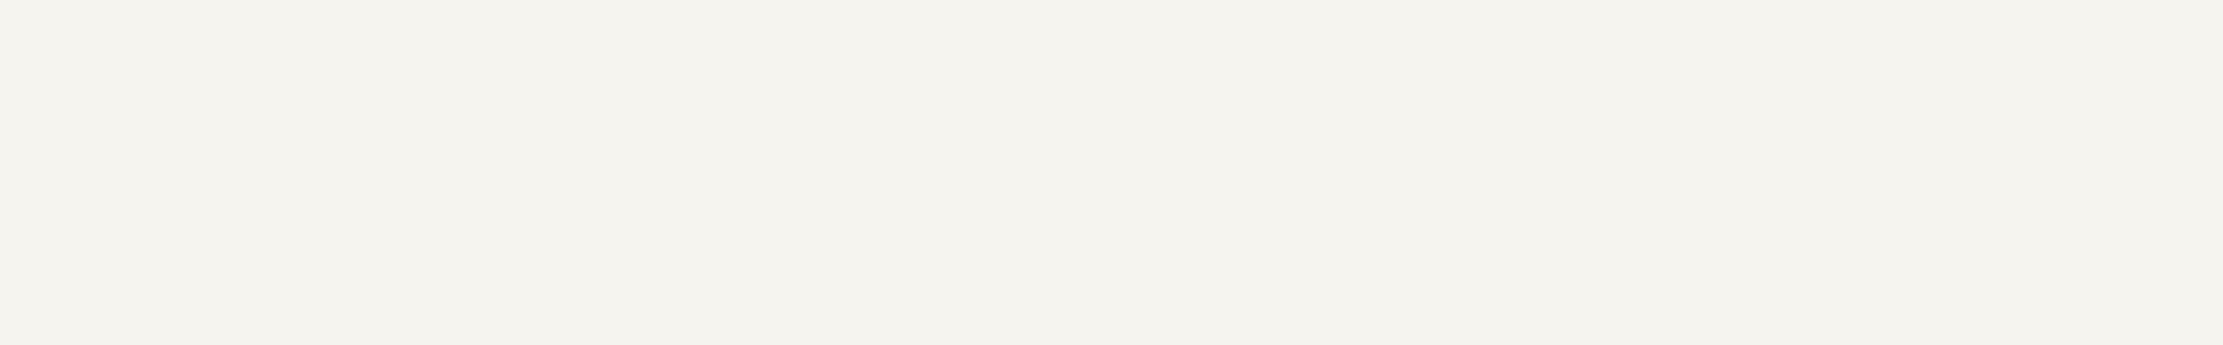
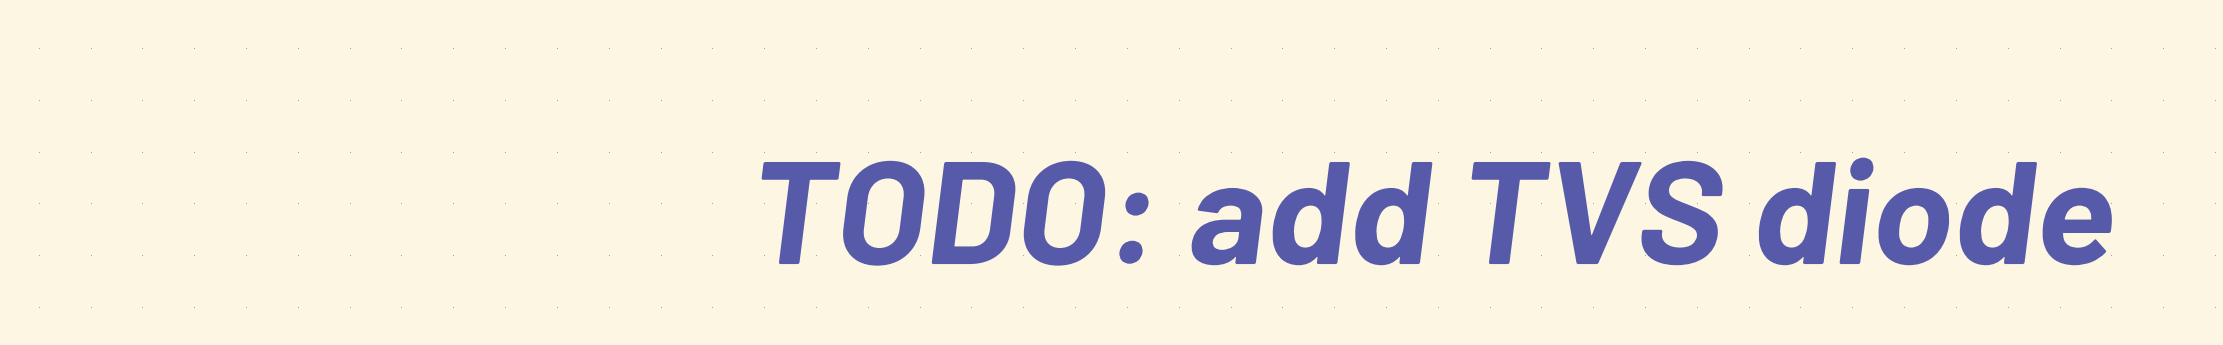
text: none -> TODO: add TVS diode (1436, 211)

